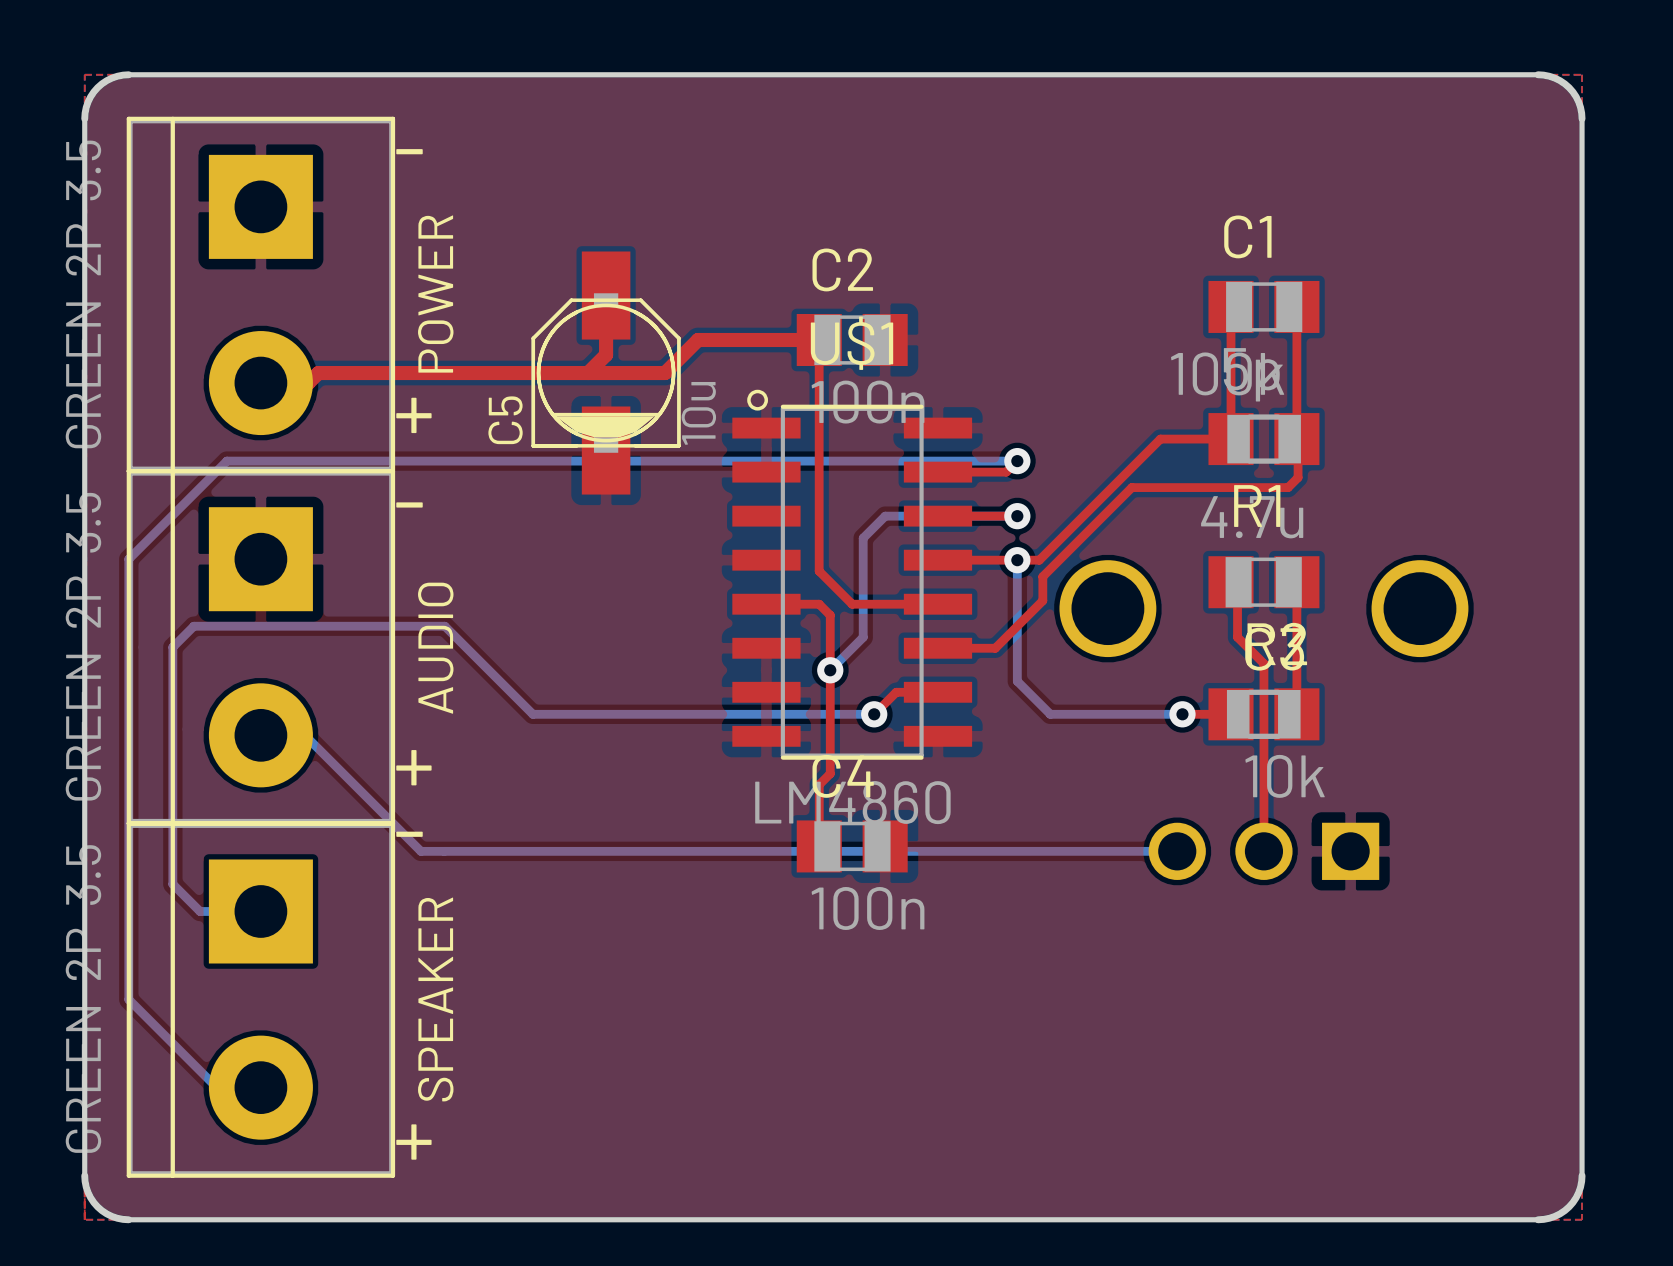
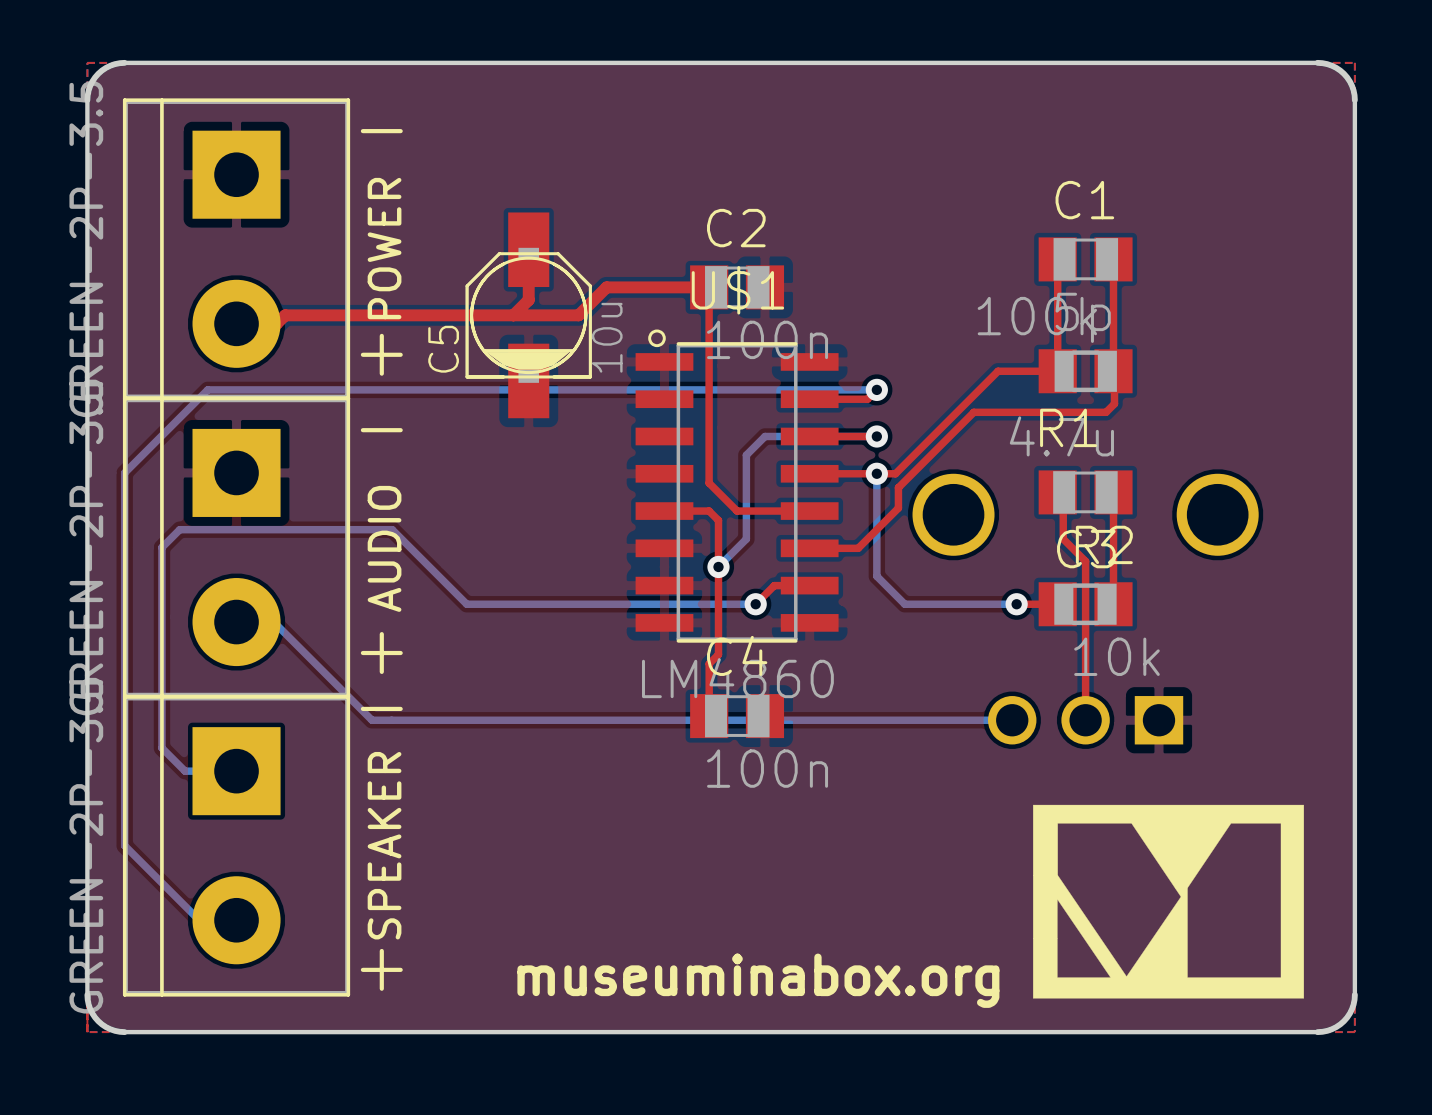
drawing: none -> [1033, 804, 1304, 999]
text: none -> museuminabox.org (758, 980)

